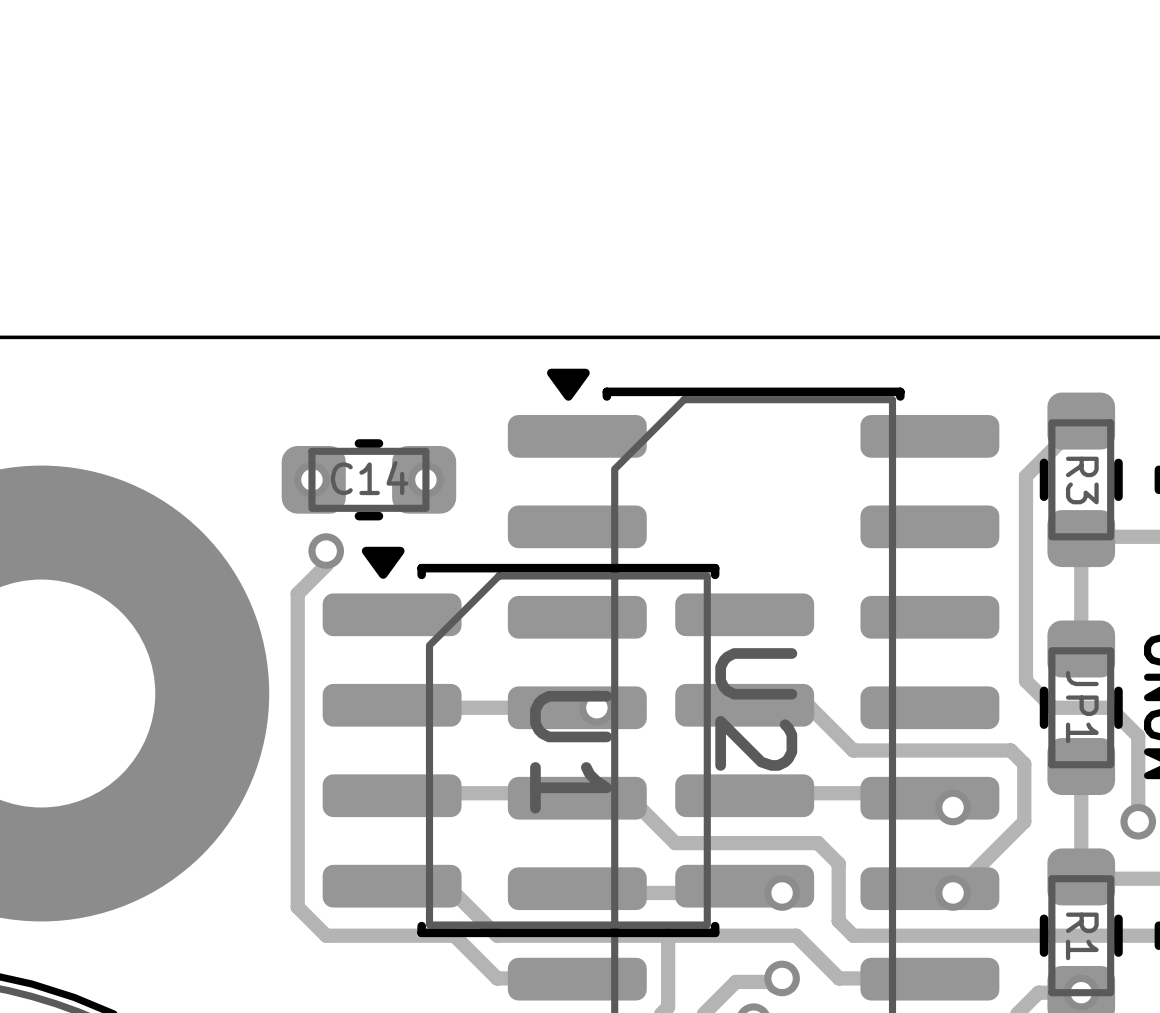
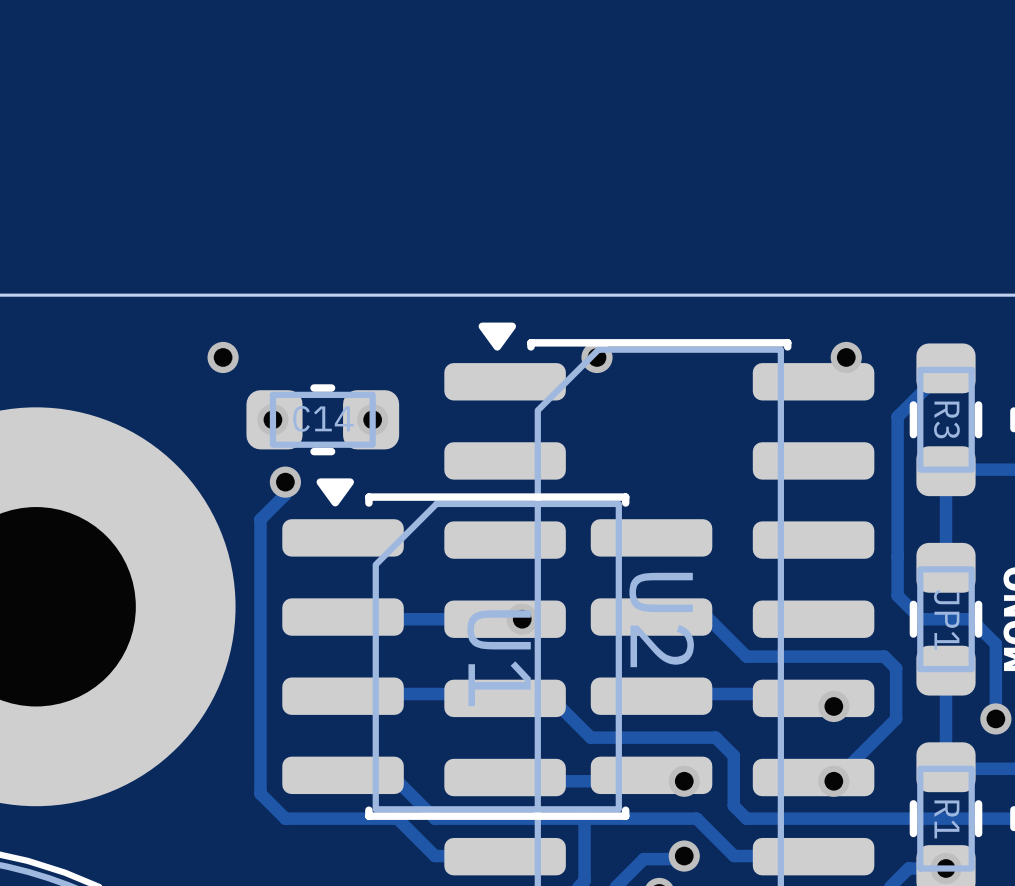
via: none -> (223, 357)
via: none -> (597, 357)
via: none -> (846, 357)

